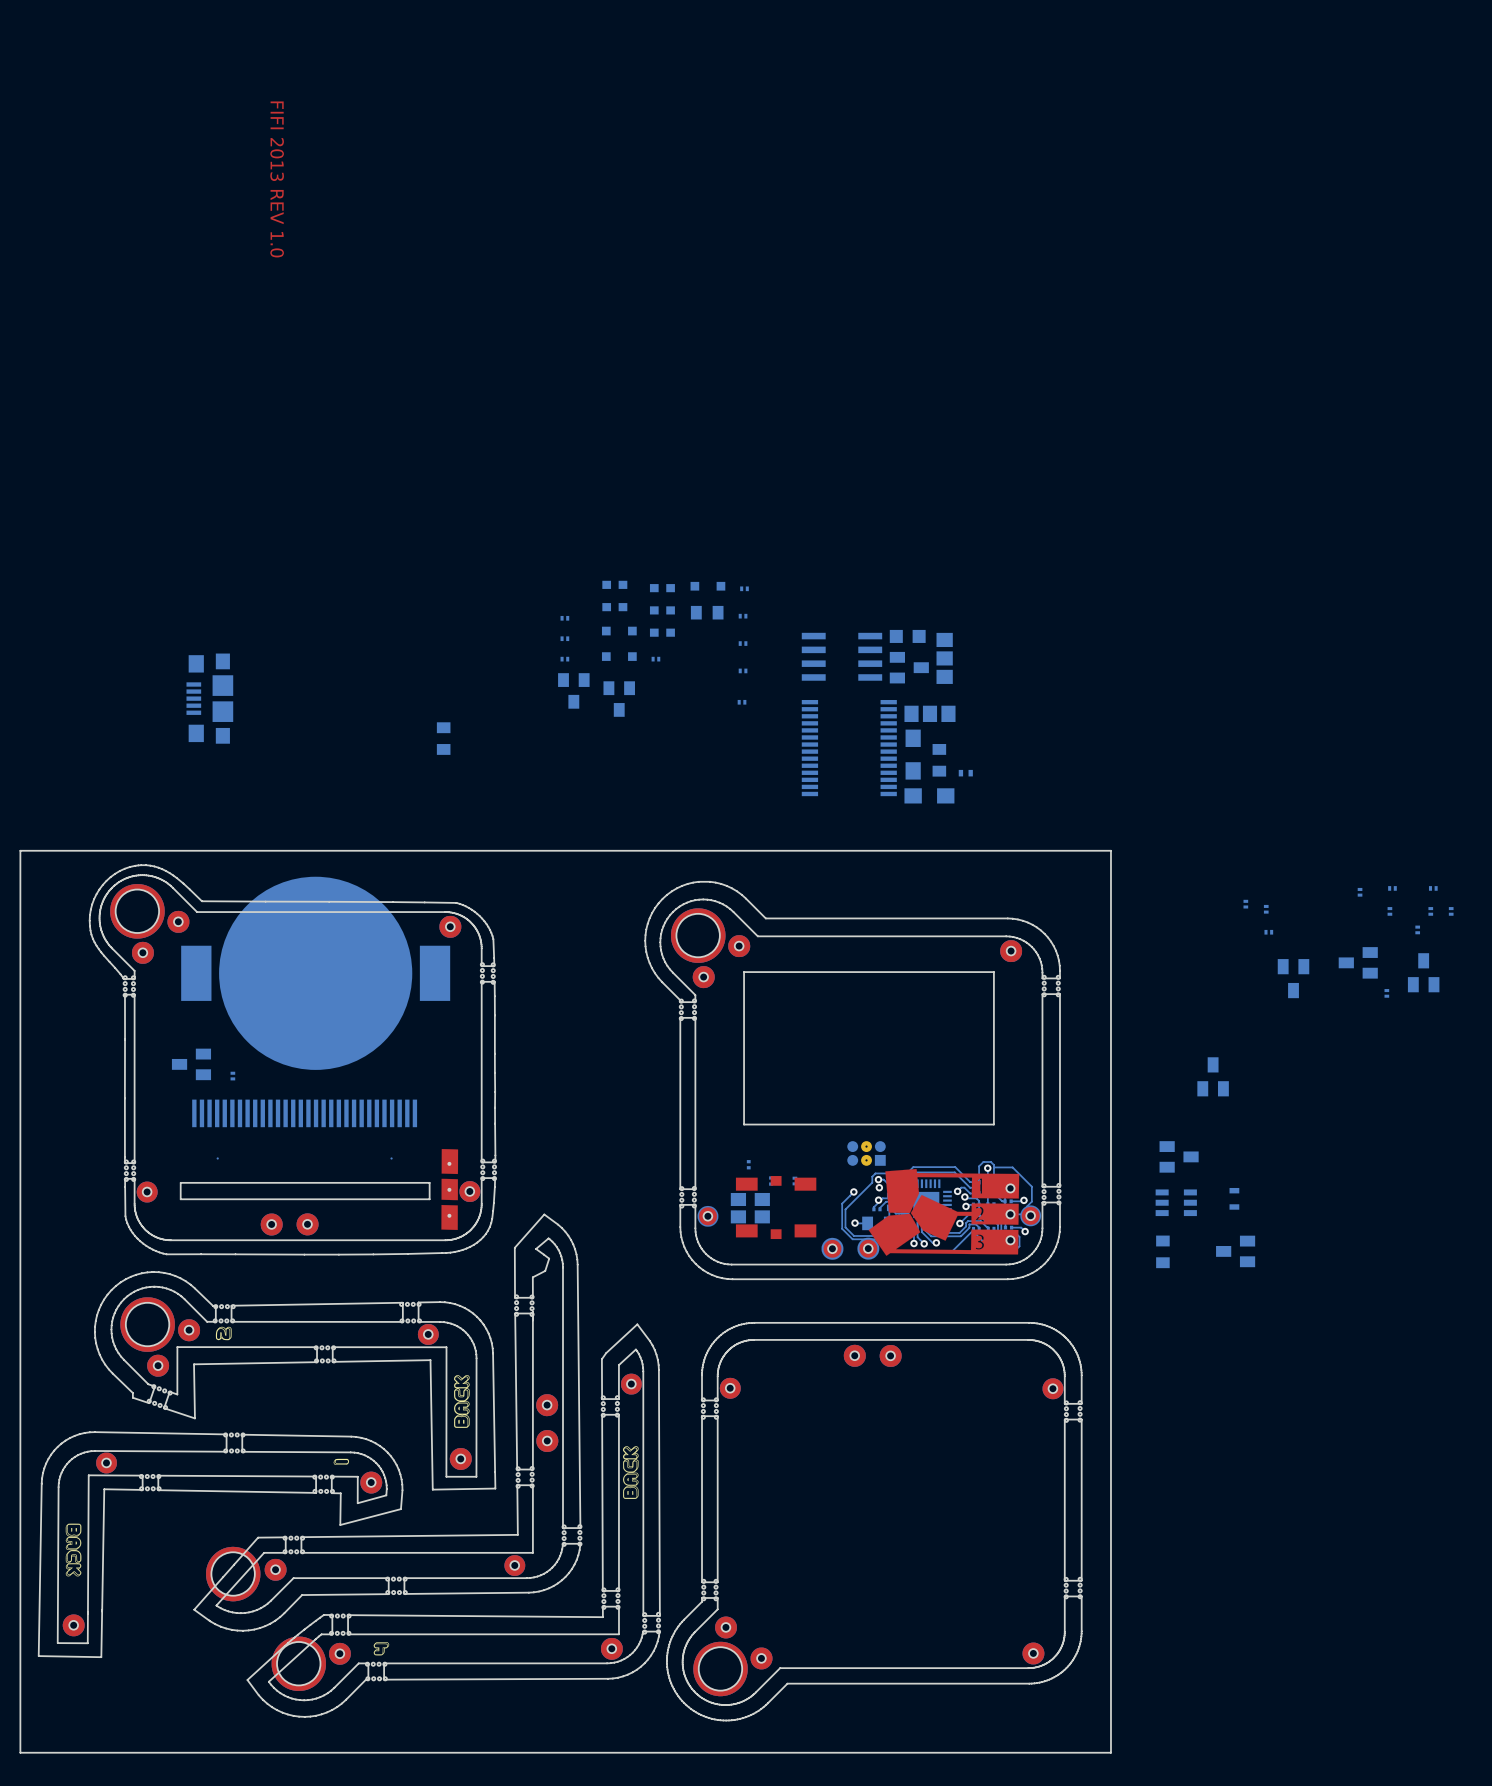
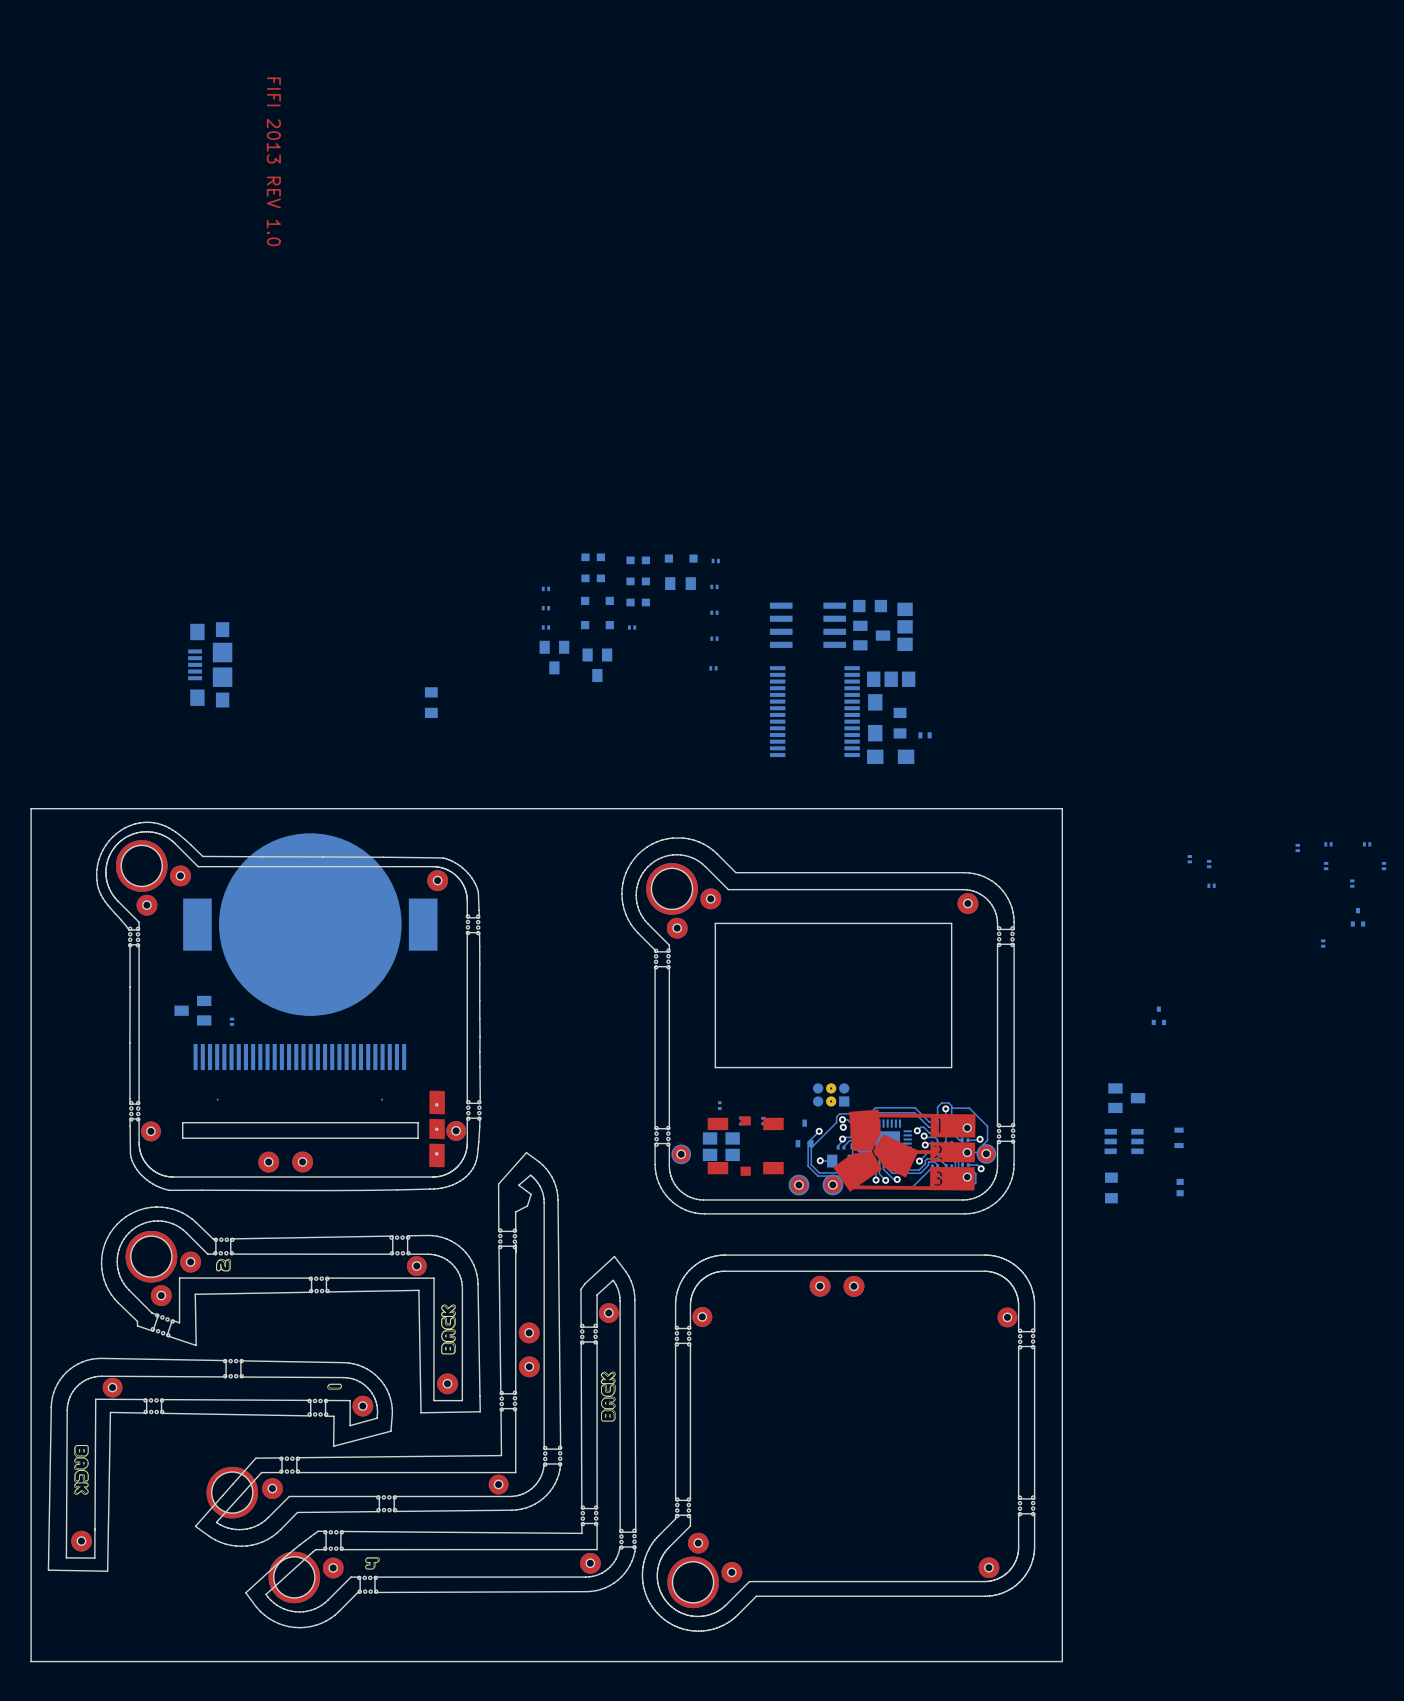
part: (1430, 911) -> none
part footprint: [1407, 953, 1440, 993] -> [1350, 908, 1366, 927]
part: (1358, 962) -> none
part: (1293, 978) -> none
part footprint: [1197, 1057, 1229, 1097] -> [1151, 1006, 1167, 1026]
part: none -> (804, 1133)
part footprint: [1216, 1235, 1256, 1268] -> [1176, 1178, 1184, 1197]

